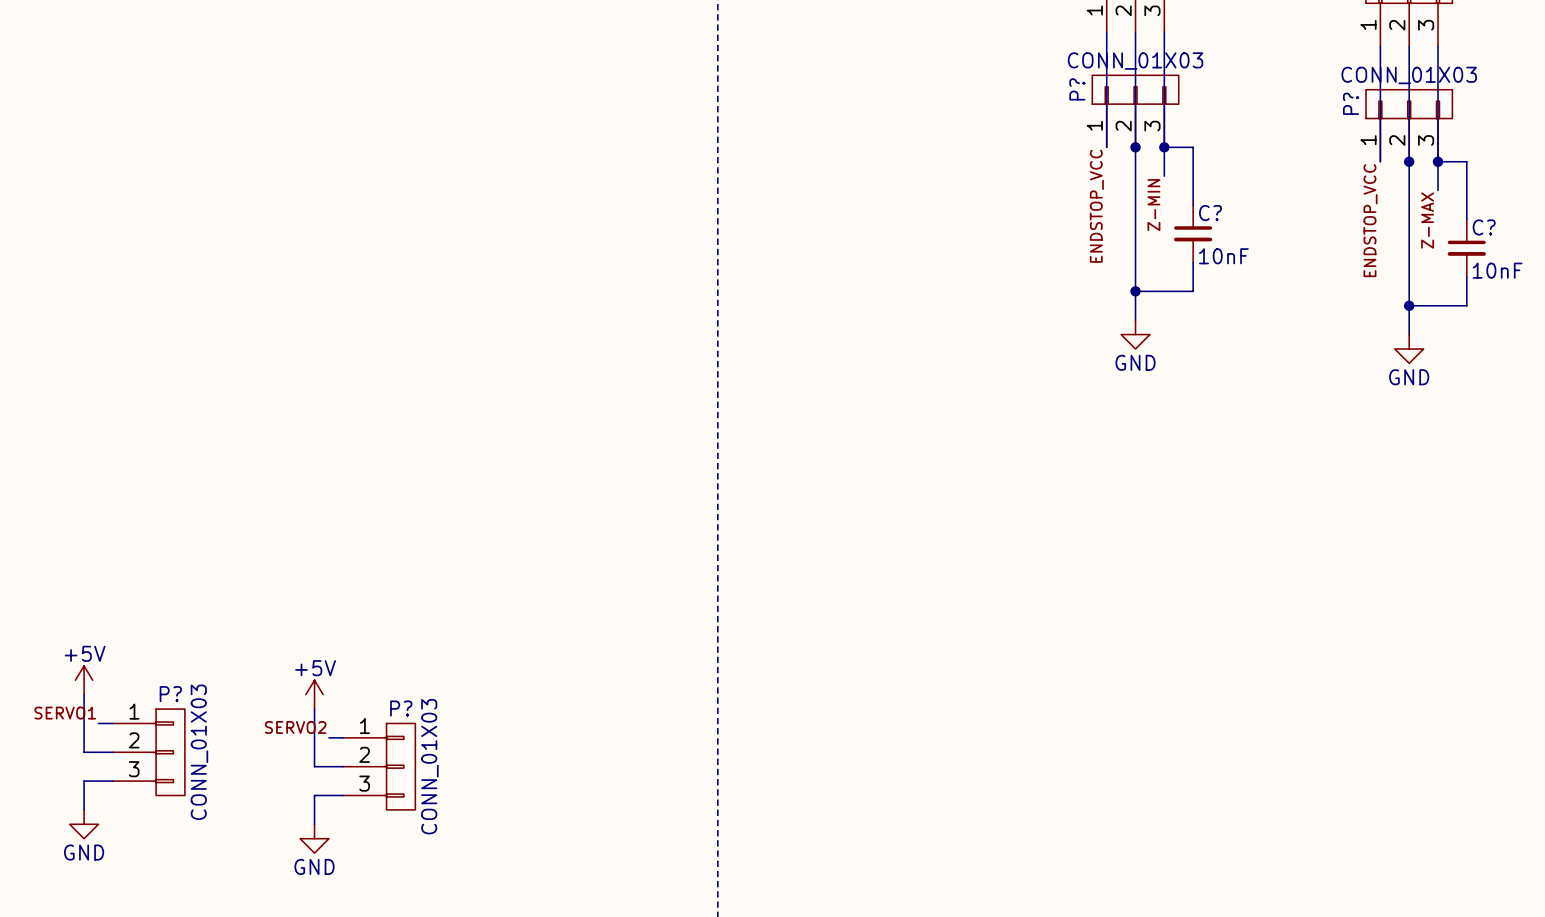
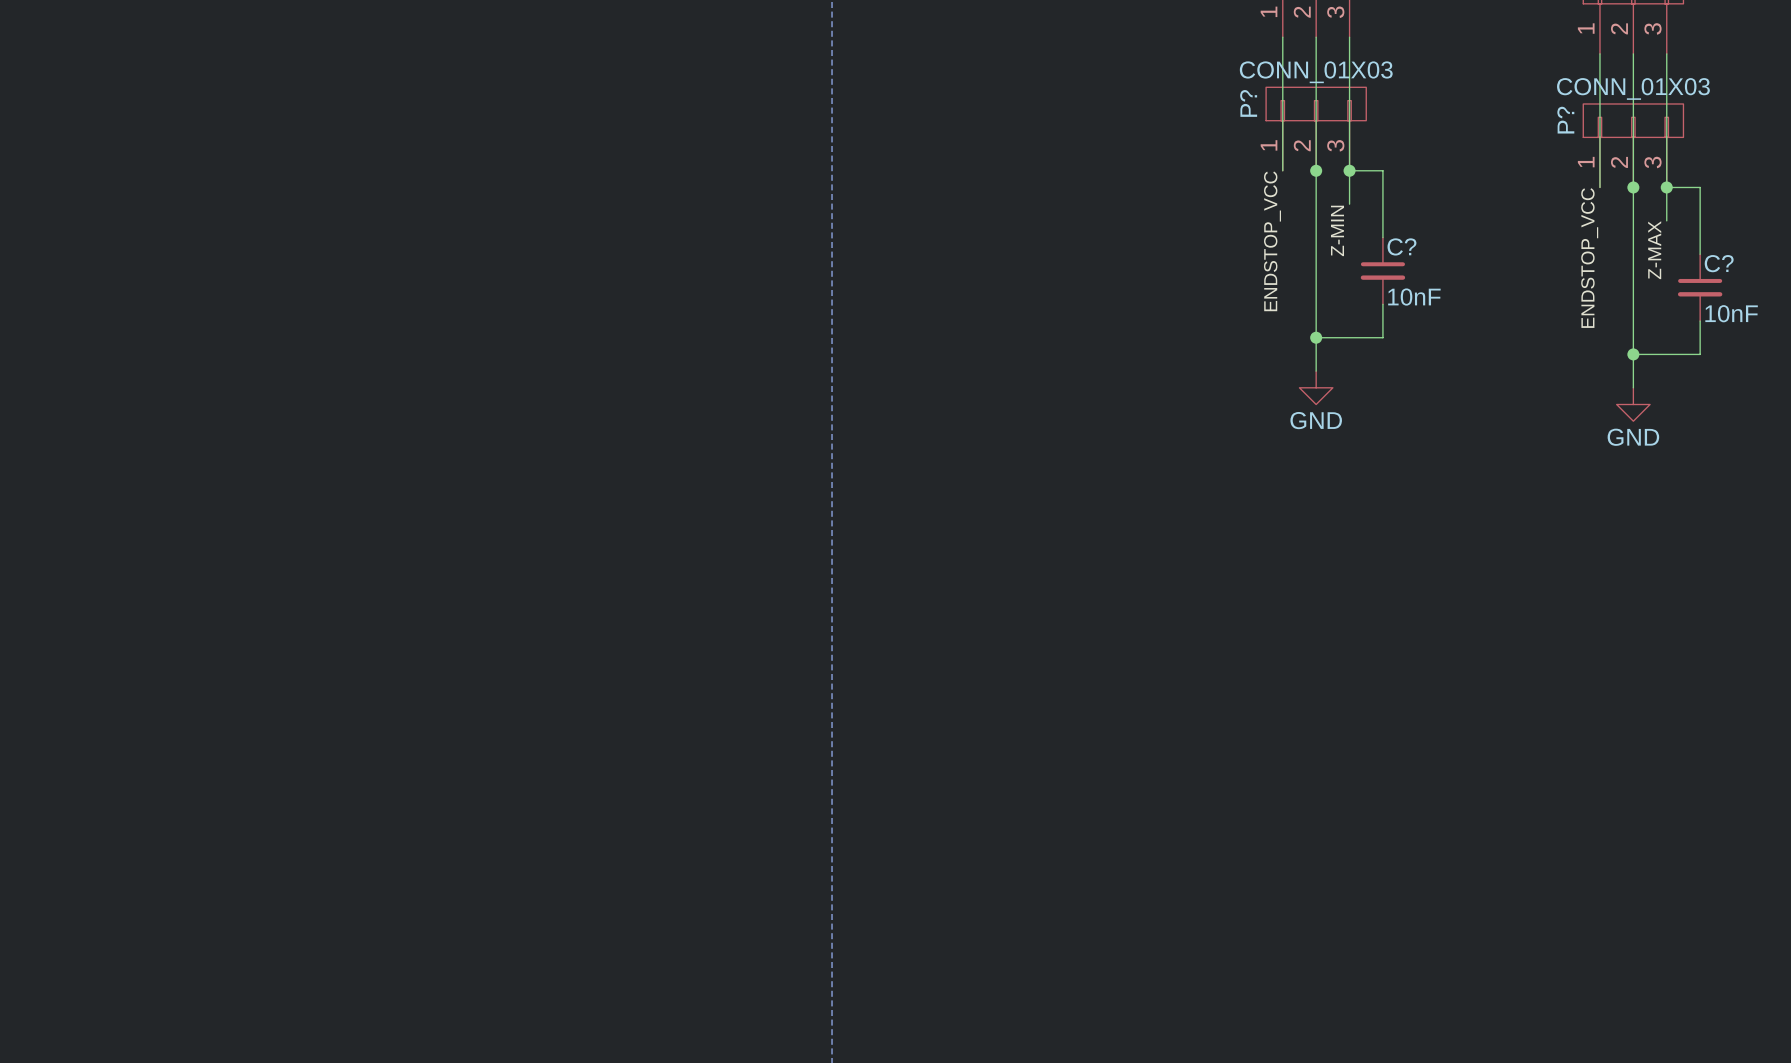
power symbol: +5V (84, 680) -> none
wire: (84, 694) (84, 752) (112, 752) -> none
power symbol: +5V (314, 694) -> none
wire: (314, 709) (314, 766) (343, 766) -> none
label: SERVO1 (65, 713) -> none
wire: (98, 723) (112, 723) -> none
label: SERVO2 (295, 727) -> none
wire: (328, 737) (343, 737) -> none
P?: CONN_01X03 (148, 752) -> none
P?: CONN_01X03 (379, 766) -> none
wire: (112, 781) (84, 781) (84, 809) -> none
wire: (343, 795) (314, 795) (314, 824) -> none
power symbol: GND (84, 824) -> none
power symbol: GND (314, 838) -> none

